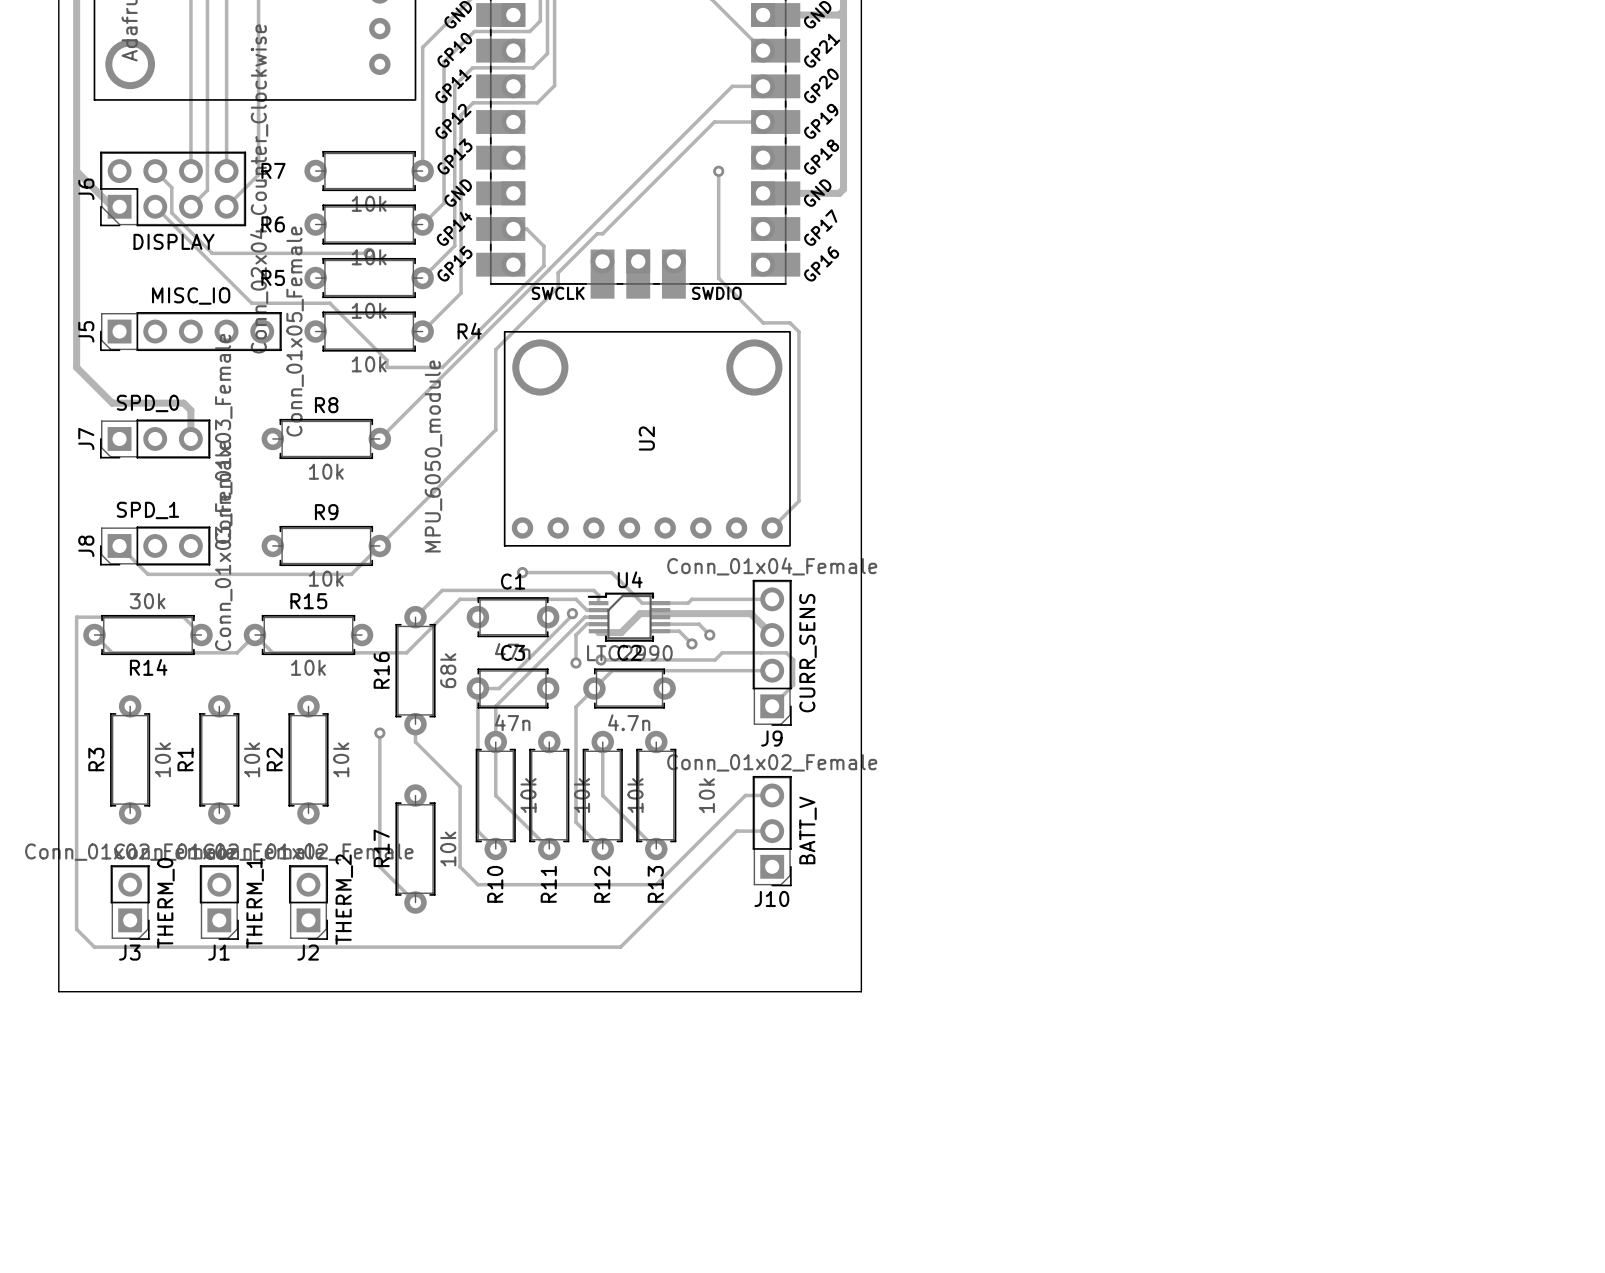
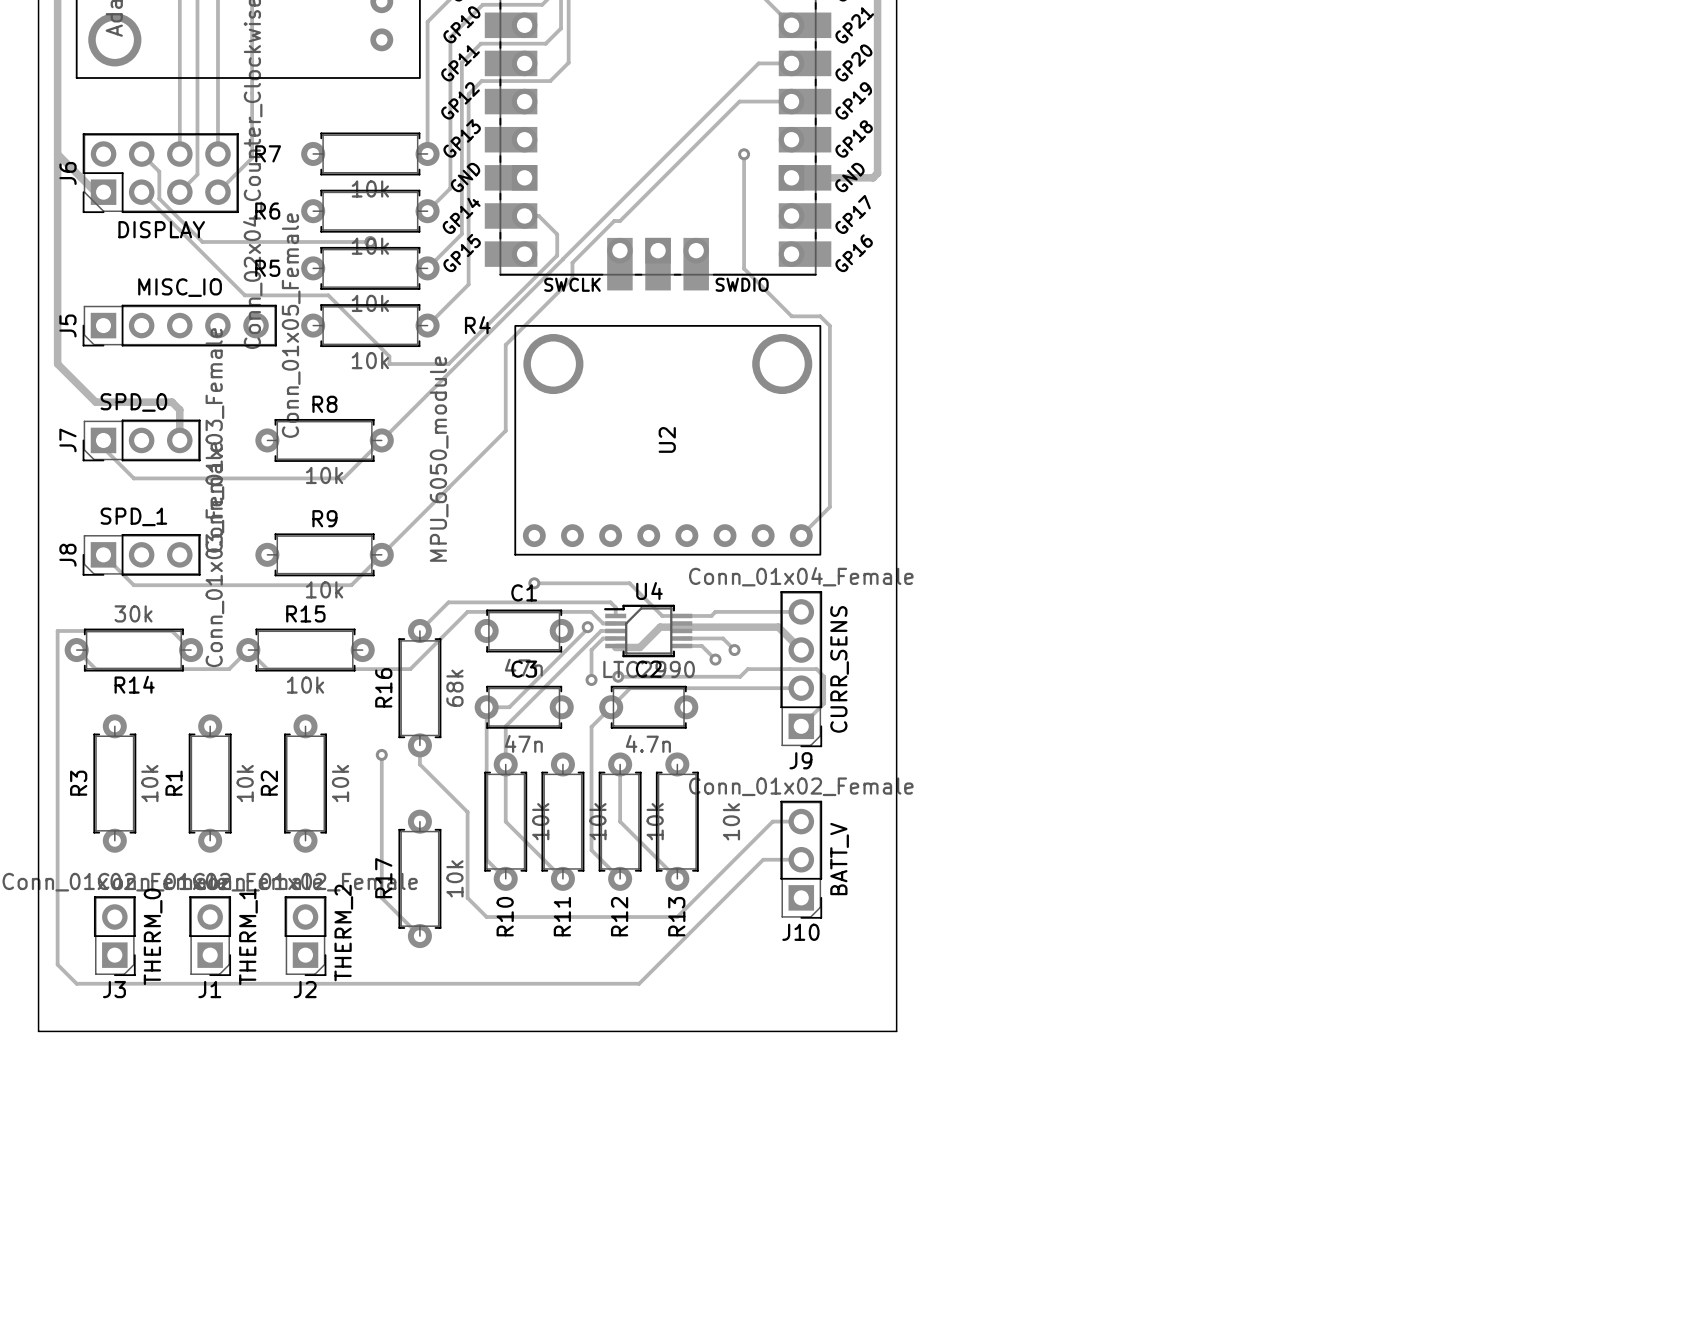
track: none -> (381, 440) (343, 478) (133, 478) (103, 448) (103, 440)

